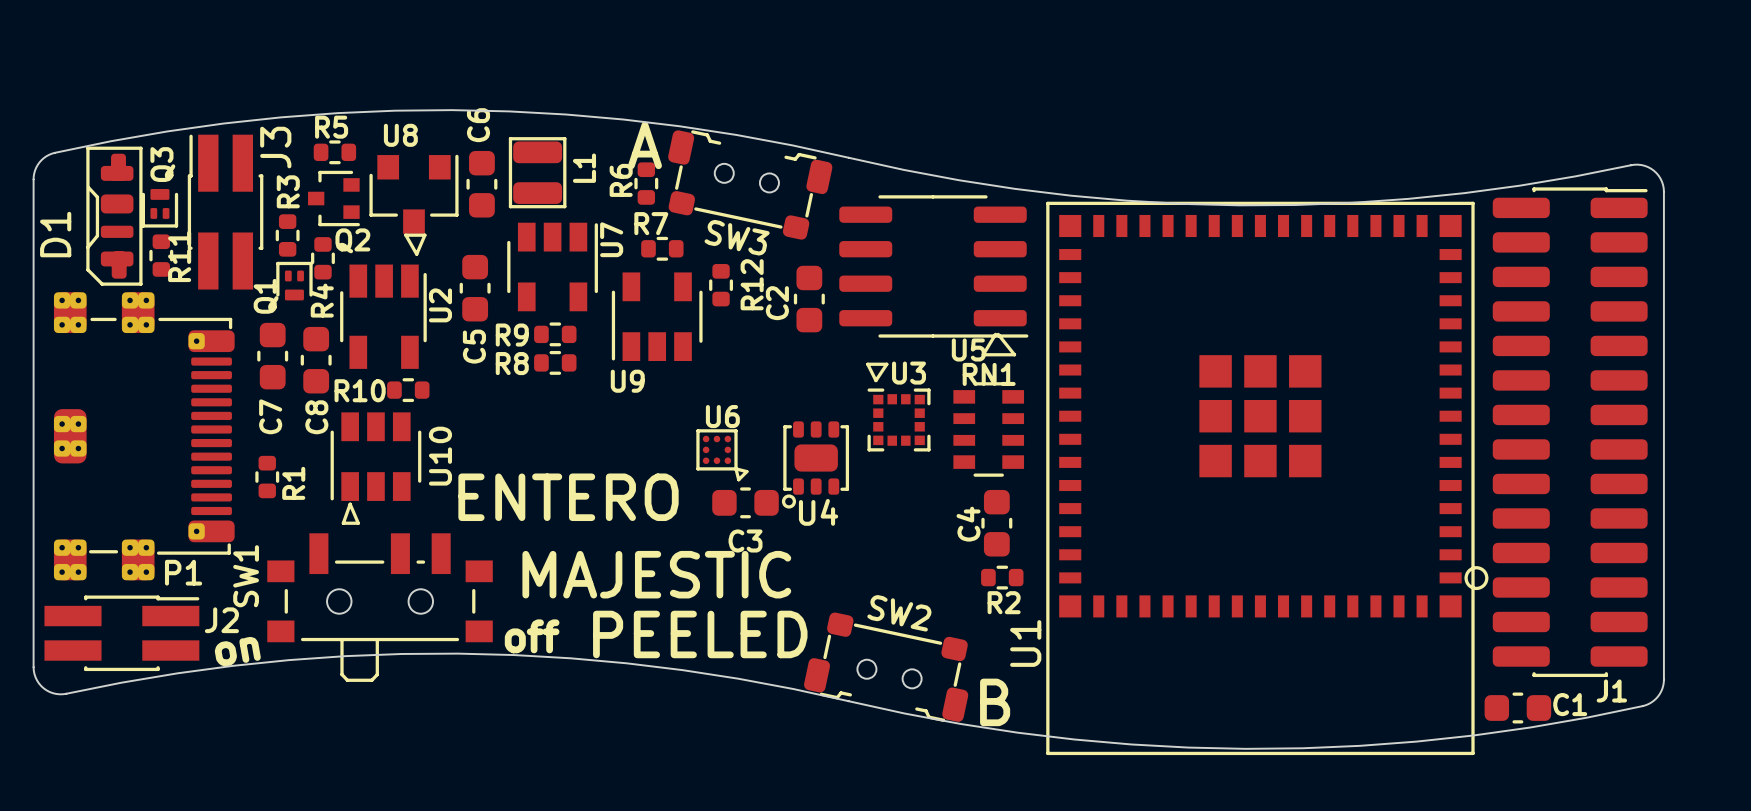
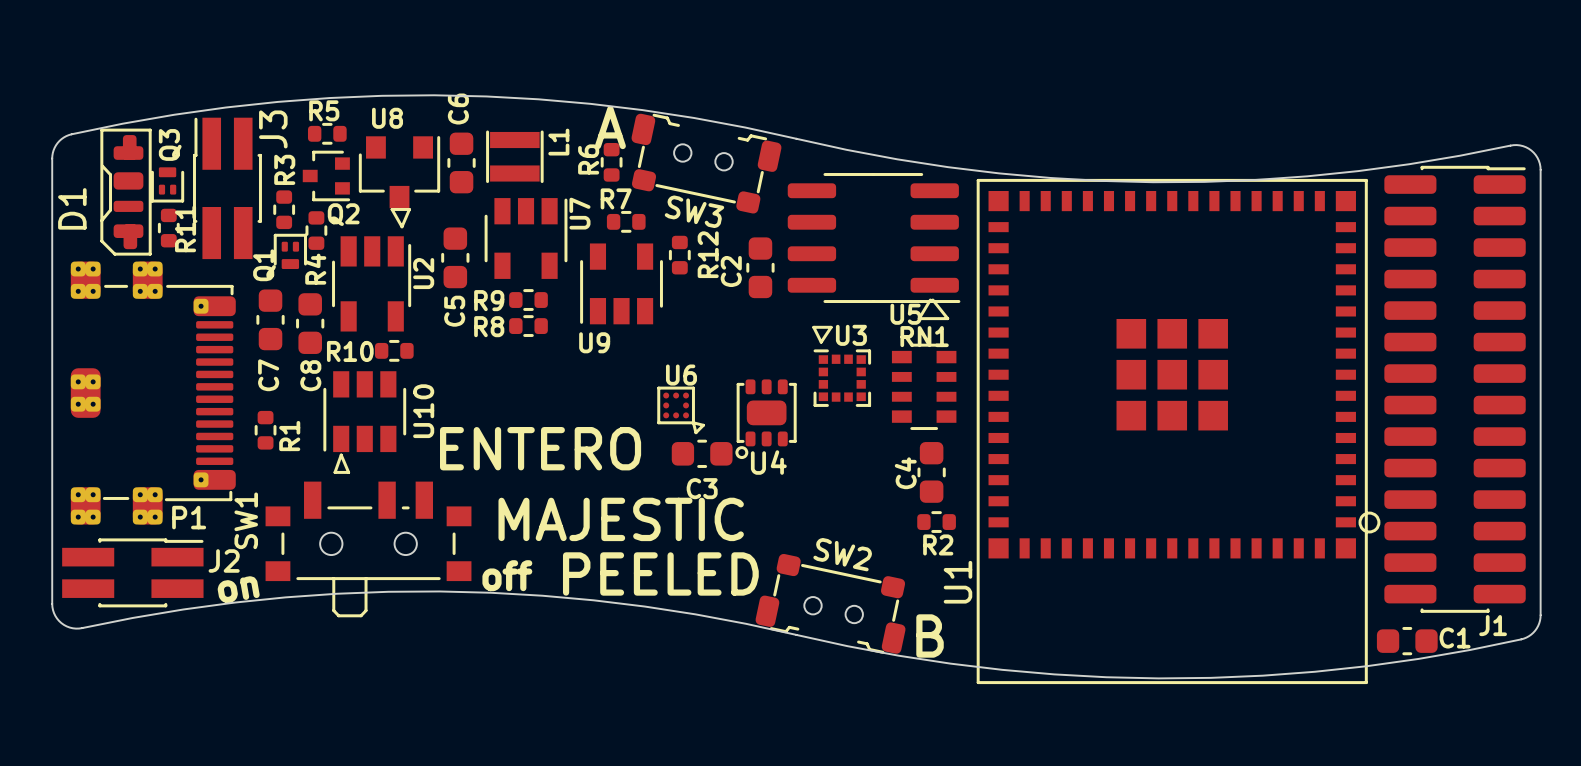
L1 footprint: [508, 137, 567, 209] -> [486, 130, 544, 184]

